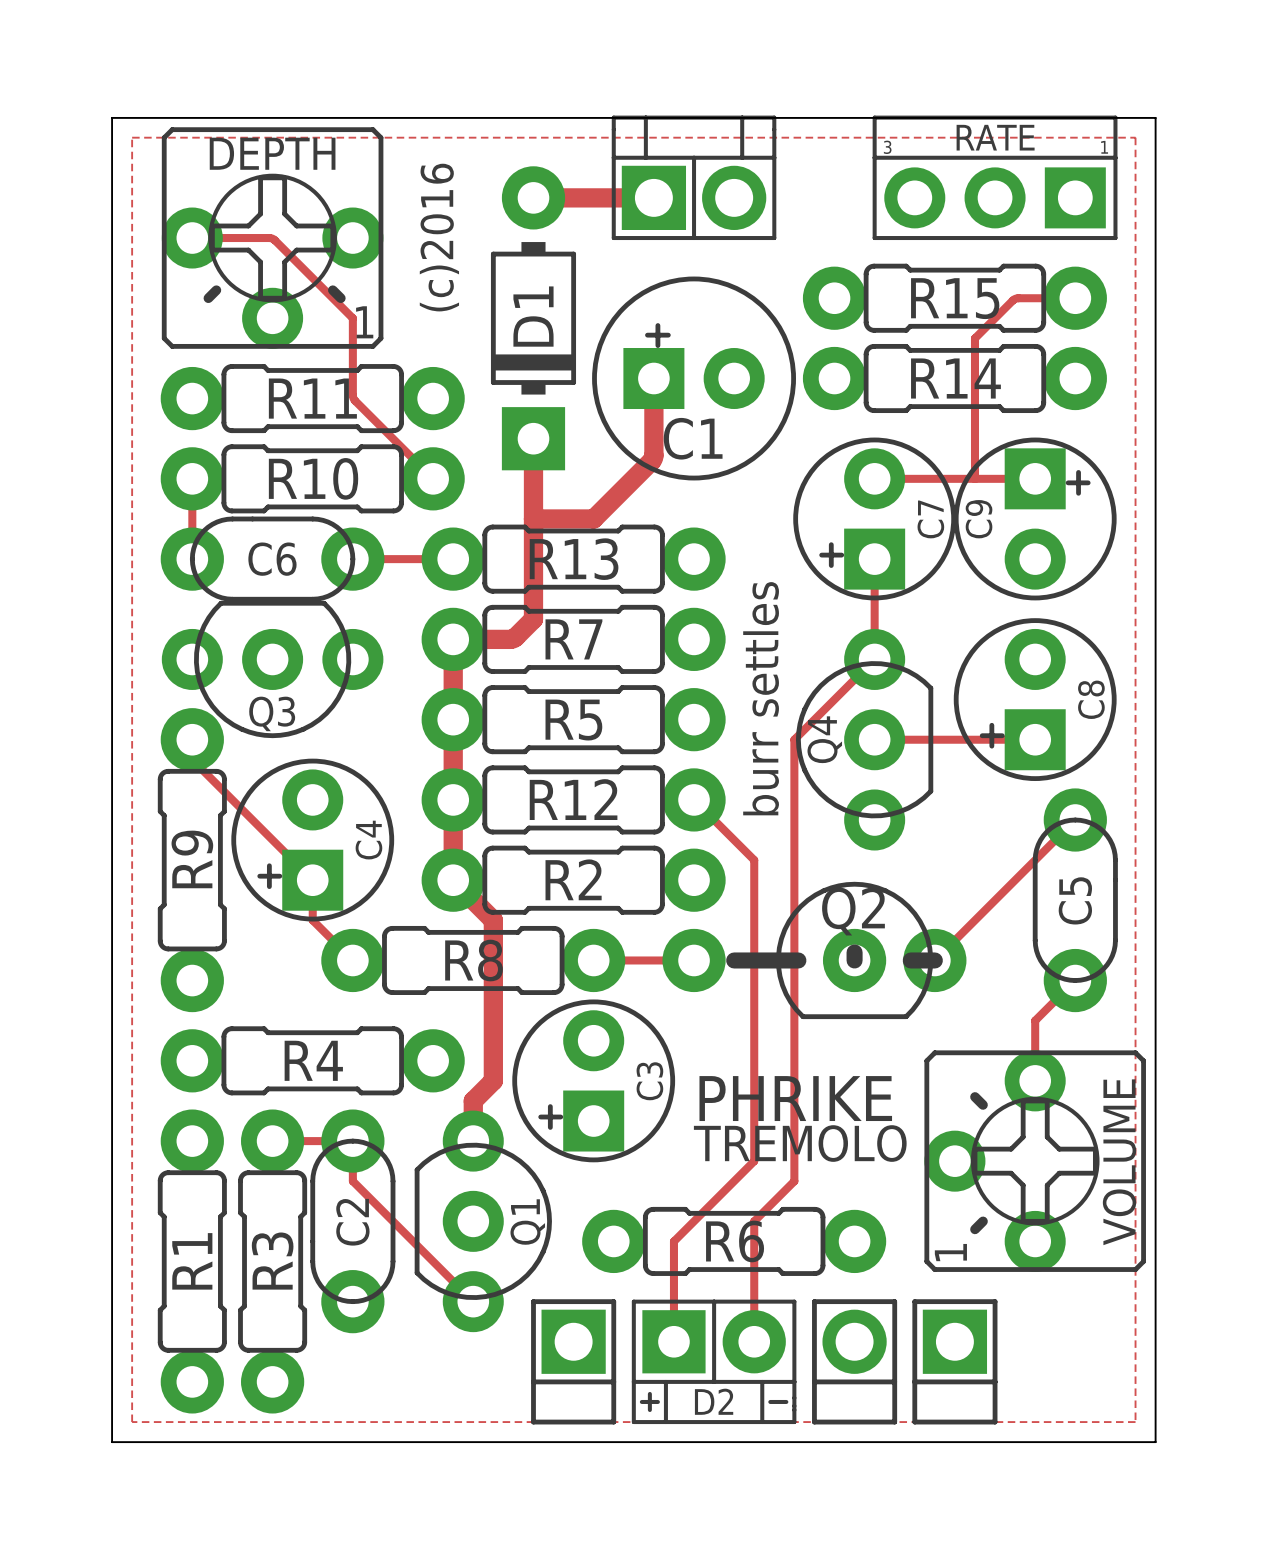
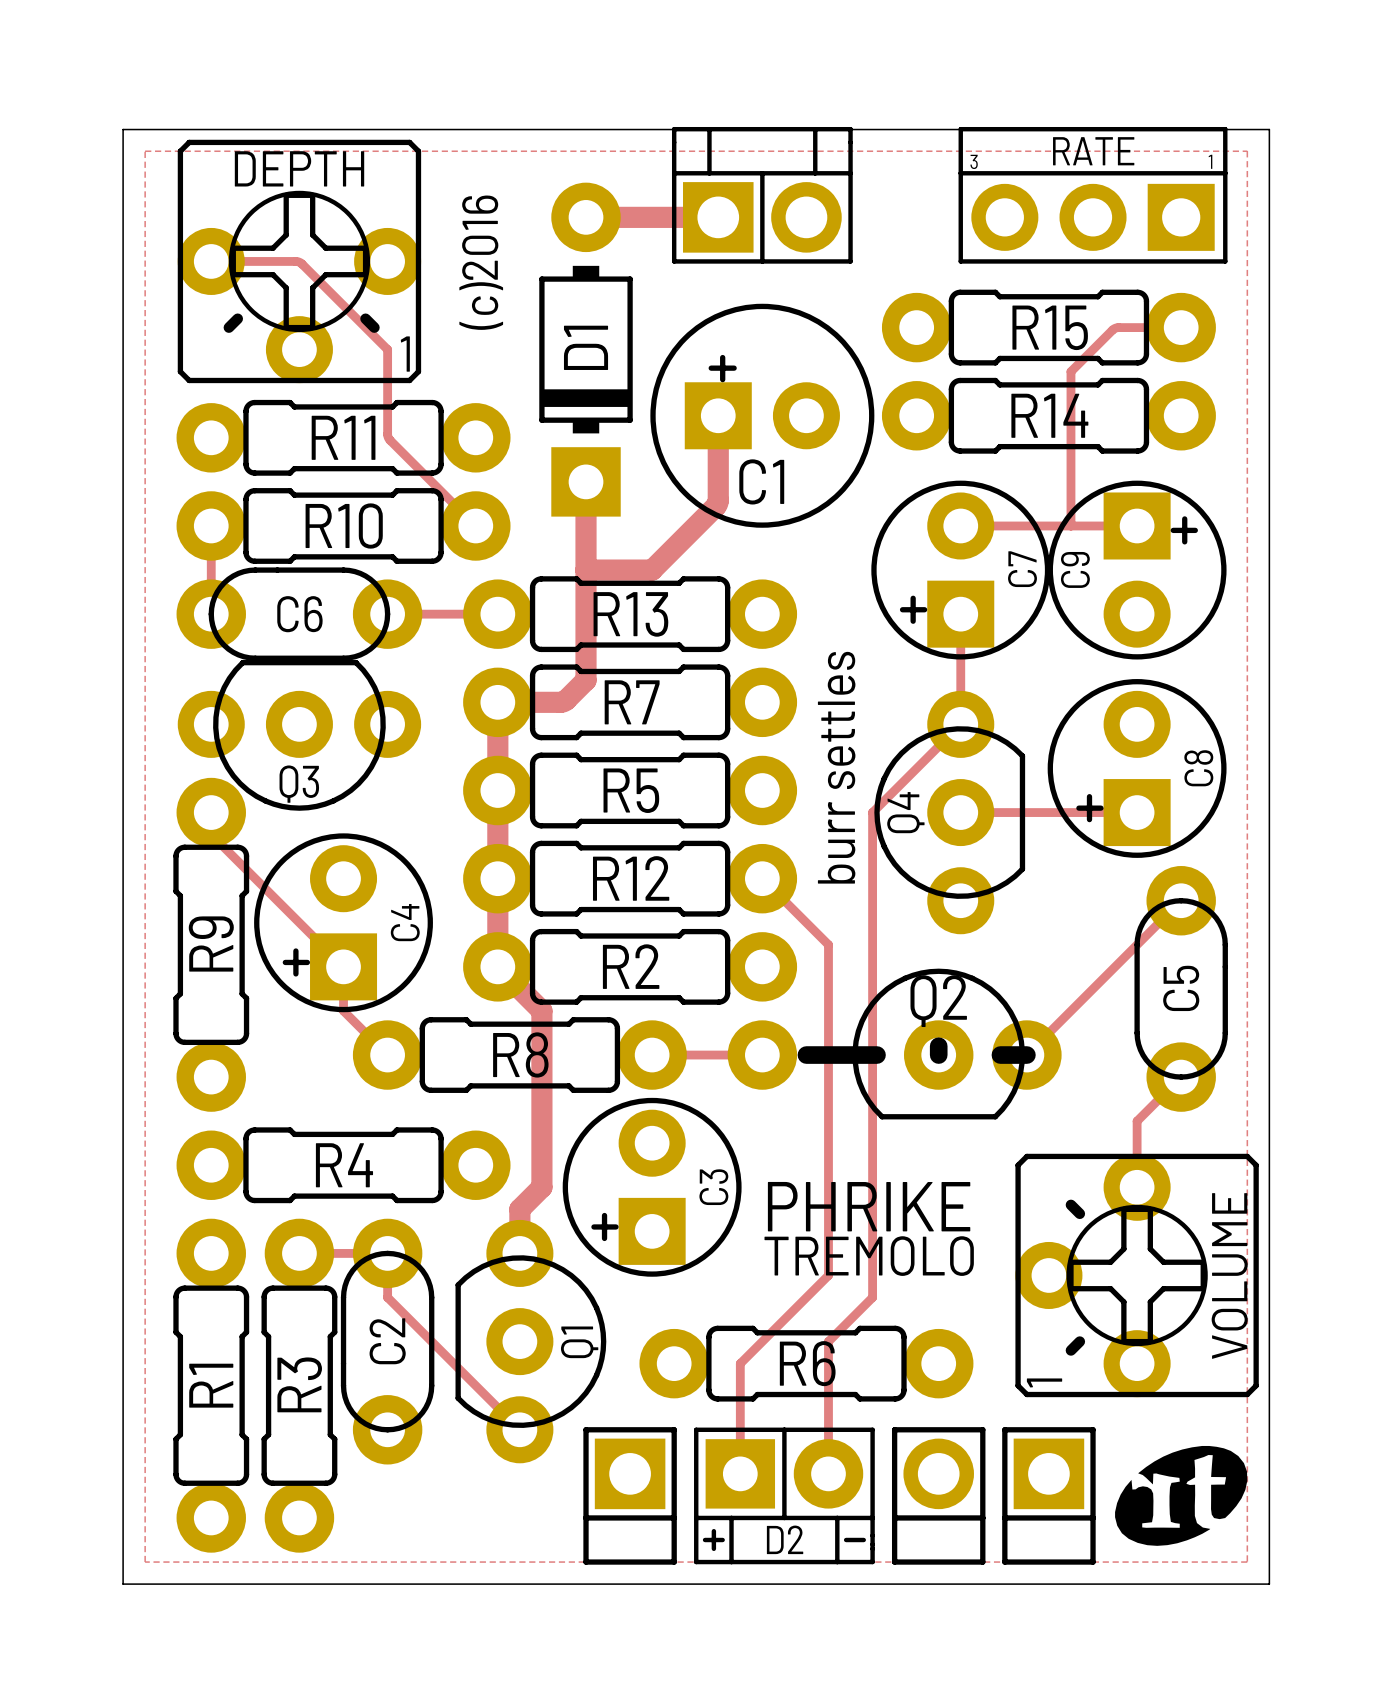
drawing: none -> [1115, 1445, 1248, 1546]

